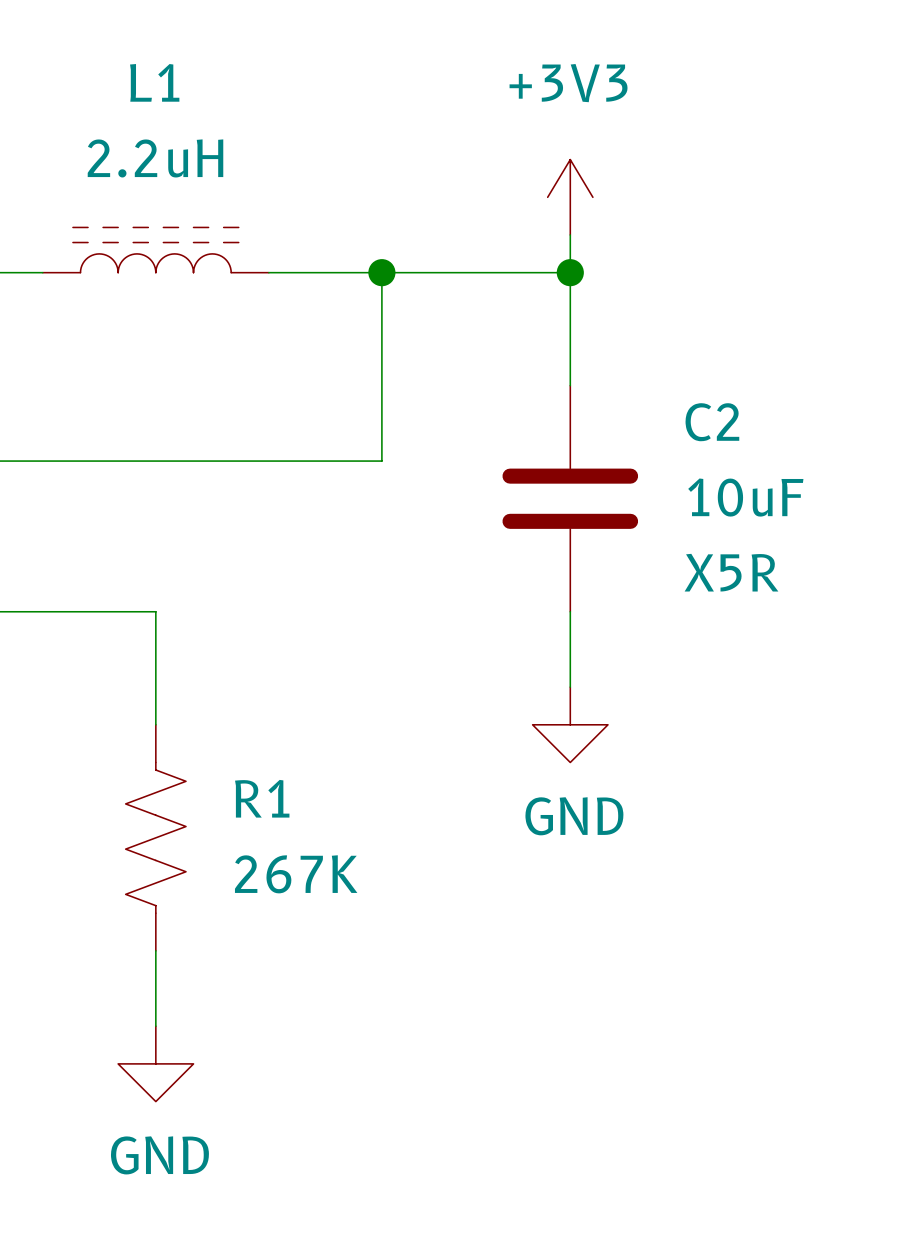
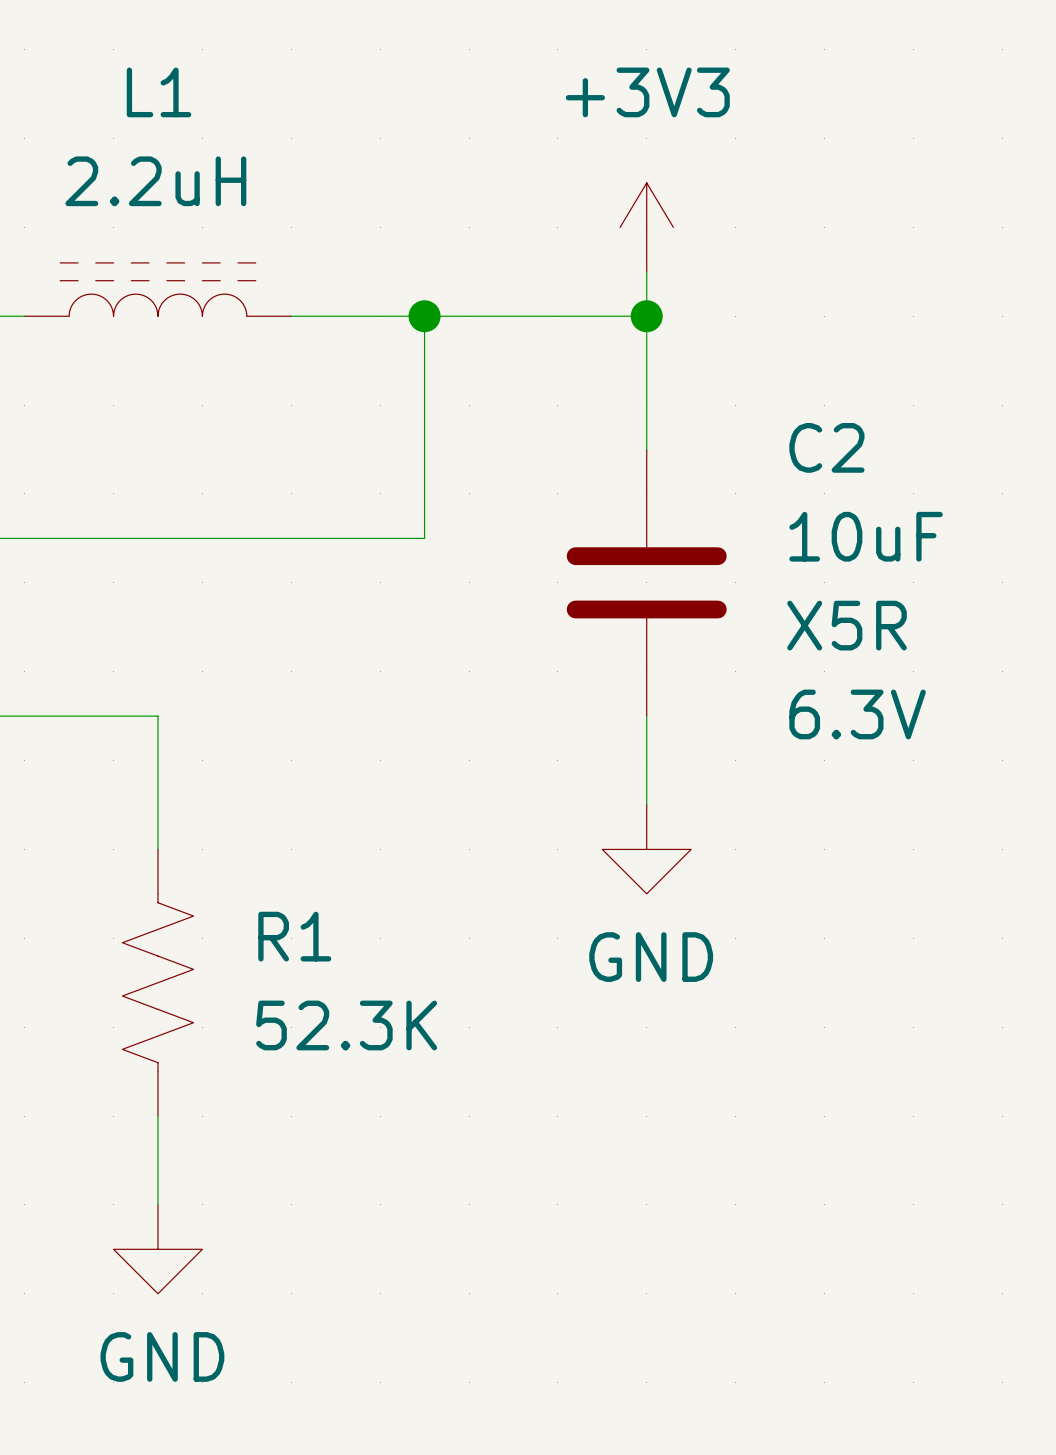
C2 name position: C2 (712, 422) -> C2 (826, 447)
C2 value position: 10uF (745, 497) -> 10uF (866, 536)
C2 text position: X5R (731, 572) -> X5R (847, 625)
C2 text: none -> 6.3V (857, 714)
R1 value: 267K (296, 874) -> 52.3K (346, 1025)

